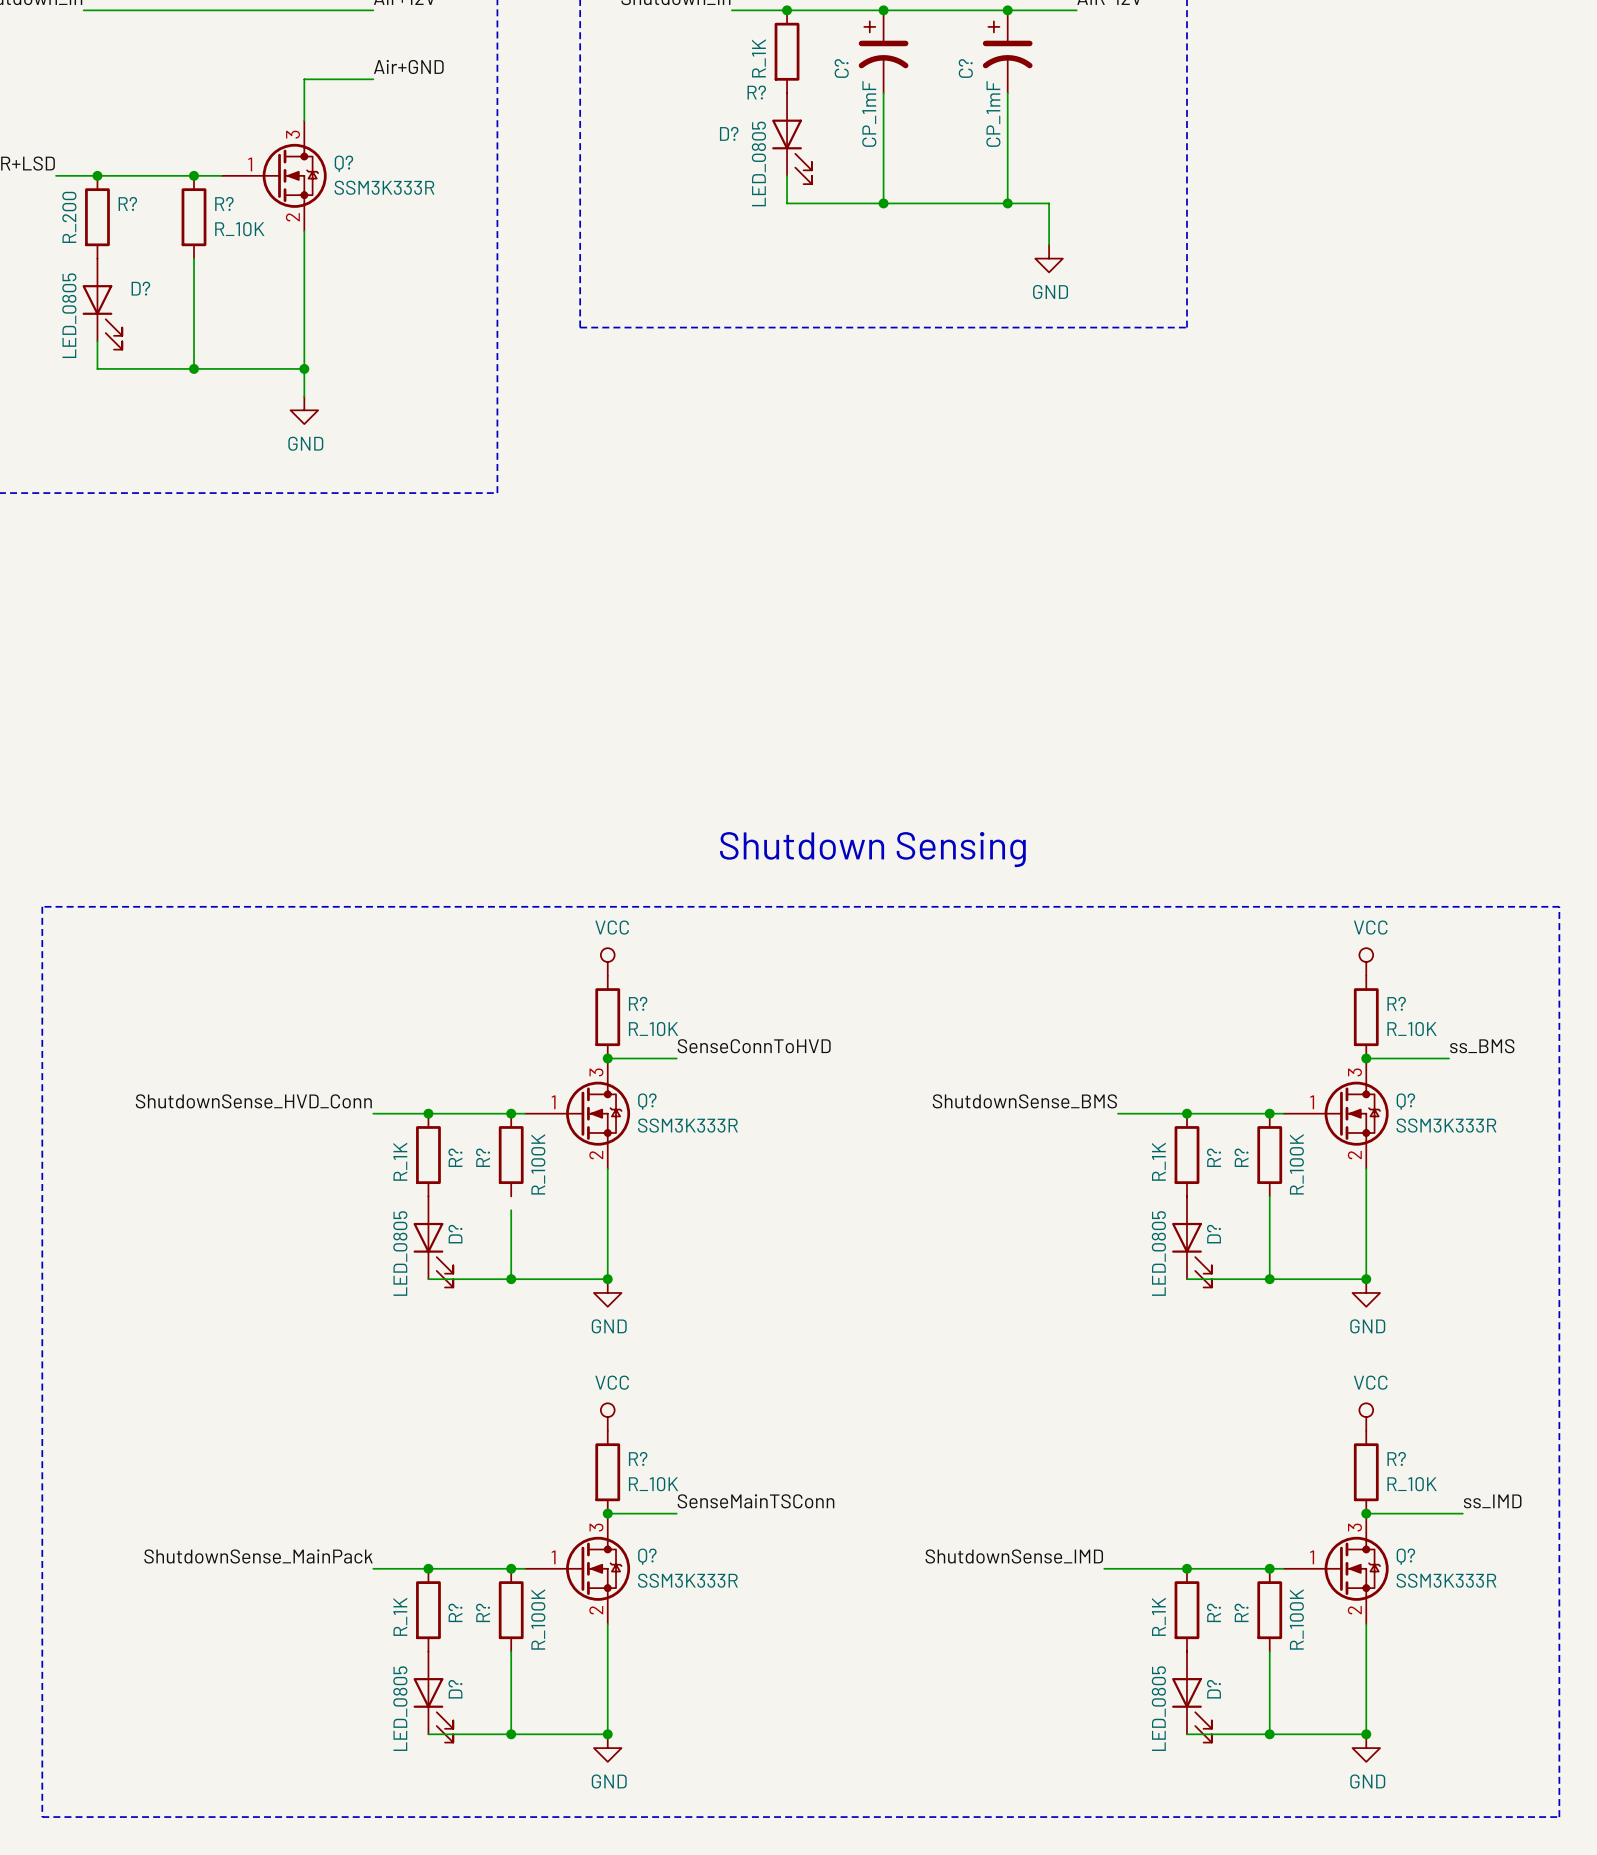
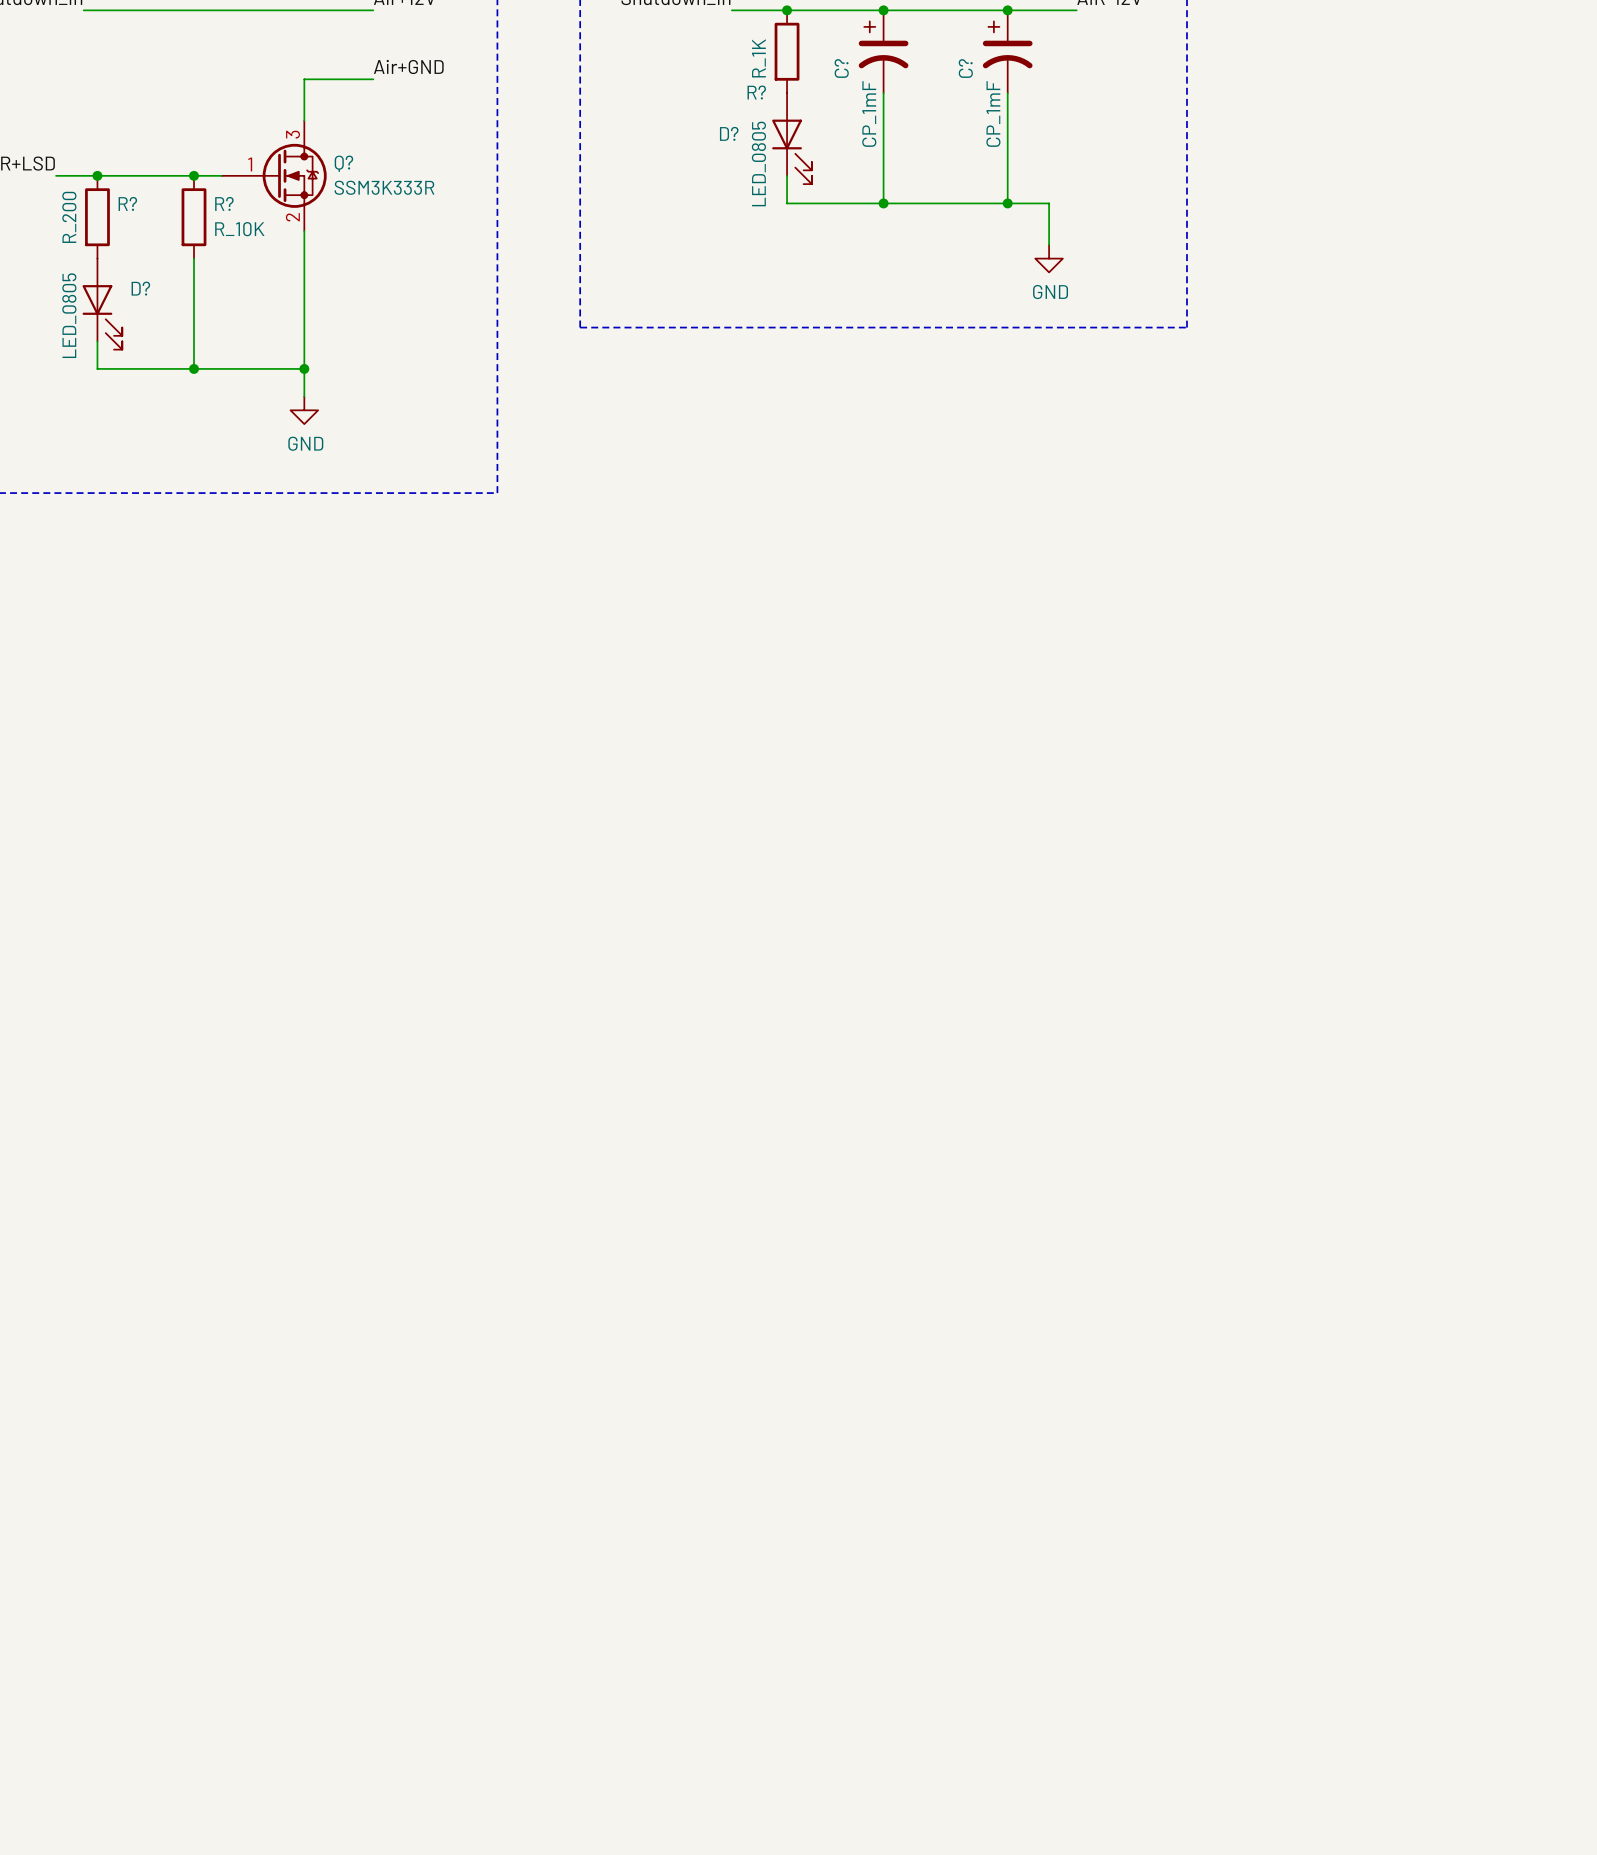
text: Shutdown Sensing (872, 849) -> none
line: (42, 906) (42, 1817) (1559, 1817) (1559, 906) (42, 906) -> none
power symbol: VCC (607, 961) -> none
power symbol: VCC (1366, 961) -> none
R?: R_10K (607, 1017) -> none
R?: R_10K (1366, 1017) -> none
label: SenseConnToHVD (754, 1046) -> none
label: ss_BMS (1482, 1046) -> none
wire: (607, 1058) (676, 1058) -> none
junction: (607, 1058) -> none
wire: (1366, 1058) (1449, 1058) -> none
junction: (1366, 1058) -> none
label: ShutdownSense_HVD_Conn (253, 1101) -> none
label: ShutdownSense_BMS (1024, 1101) -> none
wire: (373, 1113) (524, 1113) -> none
junction: (428, 1113) -> none
junction: (511, 1113) -> none
Q?: SSM3K333R (577, 1113) -> none
wire: (1118, 1113) (1283, 1113) -> none
junction: (1186, 1113) -> none
junction: (1269, 1113) -> none
Q?: SSM3K333R (1336, 1113) -> none
R?: R_1K (428, 1155) -> none
R?: R_100K (511, 1155) -> none
R?: R_1K (1186, 1155) -> none
R?: R_100K (1269, 1155) -> none
wire: (607, 1168) (607, 1279) (428, 1279) -> none
wire: (1366, 1168) (1366, 1279) (1186, 1279) -> none
wire: (1269, 1196) (1269, 1279) -> none
wire: (511, 1210) (511, 1279) -> none
D?: LED_0805 (433, 1241) -> none
D?: LED_0805 (1191, 1241) -> none
junction: (511, 1279) -> none
junction: (607, 1279) -> none
junction: (1269, 1279) -> none
junction: (1366, 1279) -> none
power symbol: GND (607, 1292) -> none
power symbol: GND (1366, 1292) -> none
power symbol: VCC (607, 1417) -> none
power symbol: VCC (1366, 1417) -> none
R?: R_10K (607, 1472) -> none
R?: R_10K (1366, 1472) -> none
label: SenseMainTSConn (756, 1501) -> none
label: ss_IMD (1492, 1501) -> none
wire: (607, 1513) (676, 1513) -> none
junction: (607, 1513) -> none
wire: (1366, 1513) (1462, 1513) -> none
junction: (1366, 1513) -> none
label: ShutdownSense_MainPack (258, 1556) -> none
label: ShutdownSense_IMD (1014, 1556) -> none
wire: (373, 1568) (524, 1568) -> none
junction: (428, 1568) -> none
junction: (511, 1568) -> none
Q?: SSM3K333R (577, 1568) -> none
wire: (1104, 1568) (1283, 1568) -> none
junction: (1186, 1568) -> none
junction: (1269, 1568) -> none
Q?: SSM3K333R (1336, 1568) -> none
R?: R_1K (428, 1610) -> none
R?: R_100K (511, 1610) -> none
R?: R_1K (1186, 1610) -> none
R?: R_100K (1269, 1610) -> none
wire: (607, 1623) (607, 1734) (428, 1734) -> none
wire: (1366, 1623) (1366, 1734) (1186, 1734) -> none
wire: (511, 1651) (511, 1734) -> none
wire: (1269, 1651) (1269, 1734) -> none
D?: LED_0805 (433, 1697) -> none
D?: LED_0805 (1191, 1697) -> none
junction: (511, 1734) -> none
junction: (607, 1734) -> none
junction: (1269, 1734) -> none
junction: (1366, 1734) -> none
power symbol: GND (607, 1748) -> none
power symbol: GND (1366, 1748) -> none

